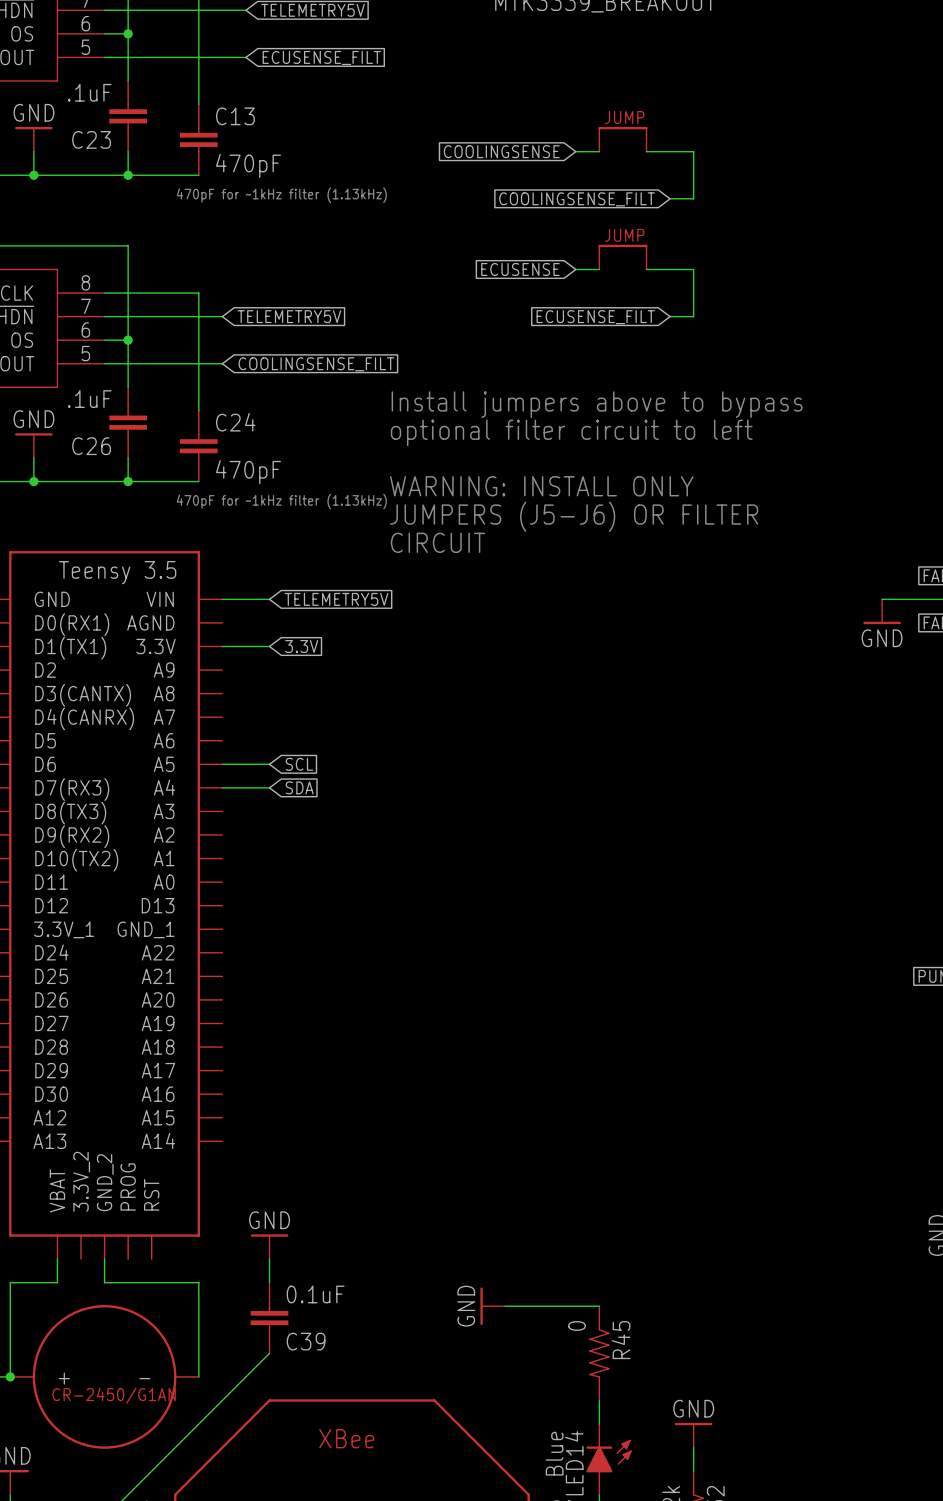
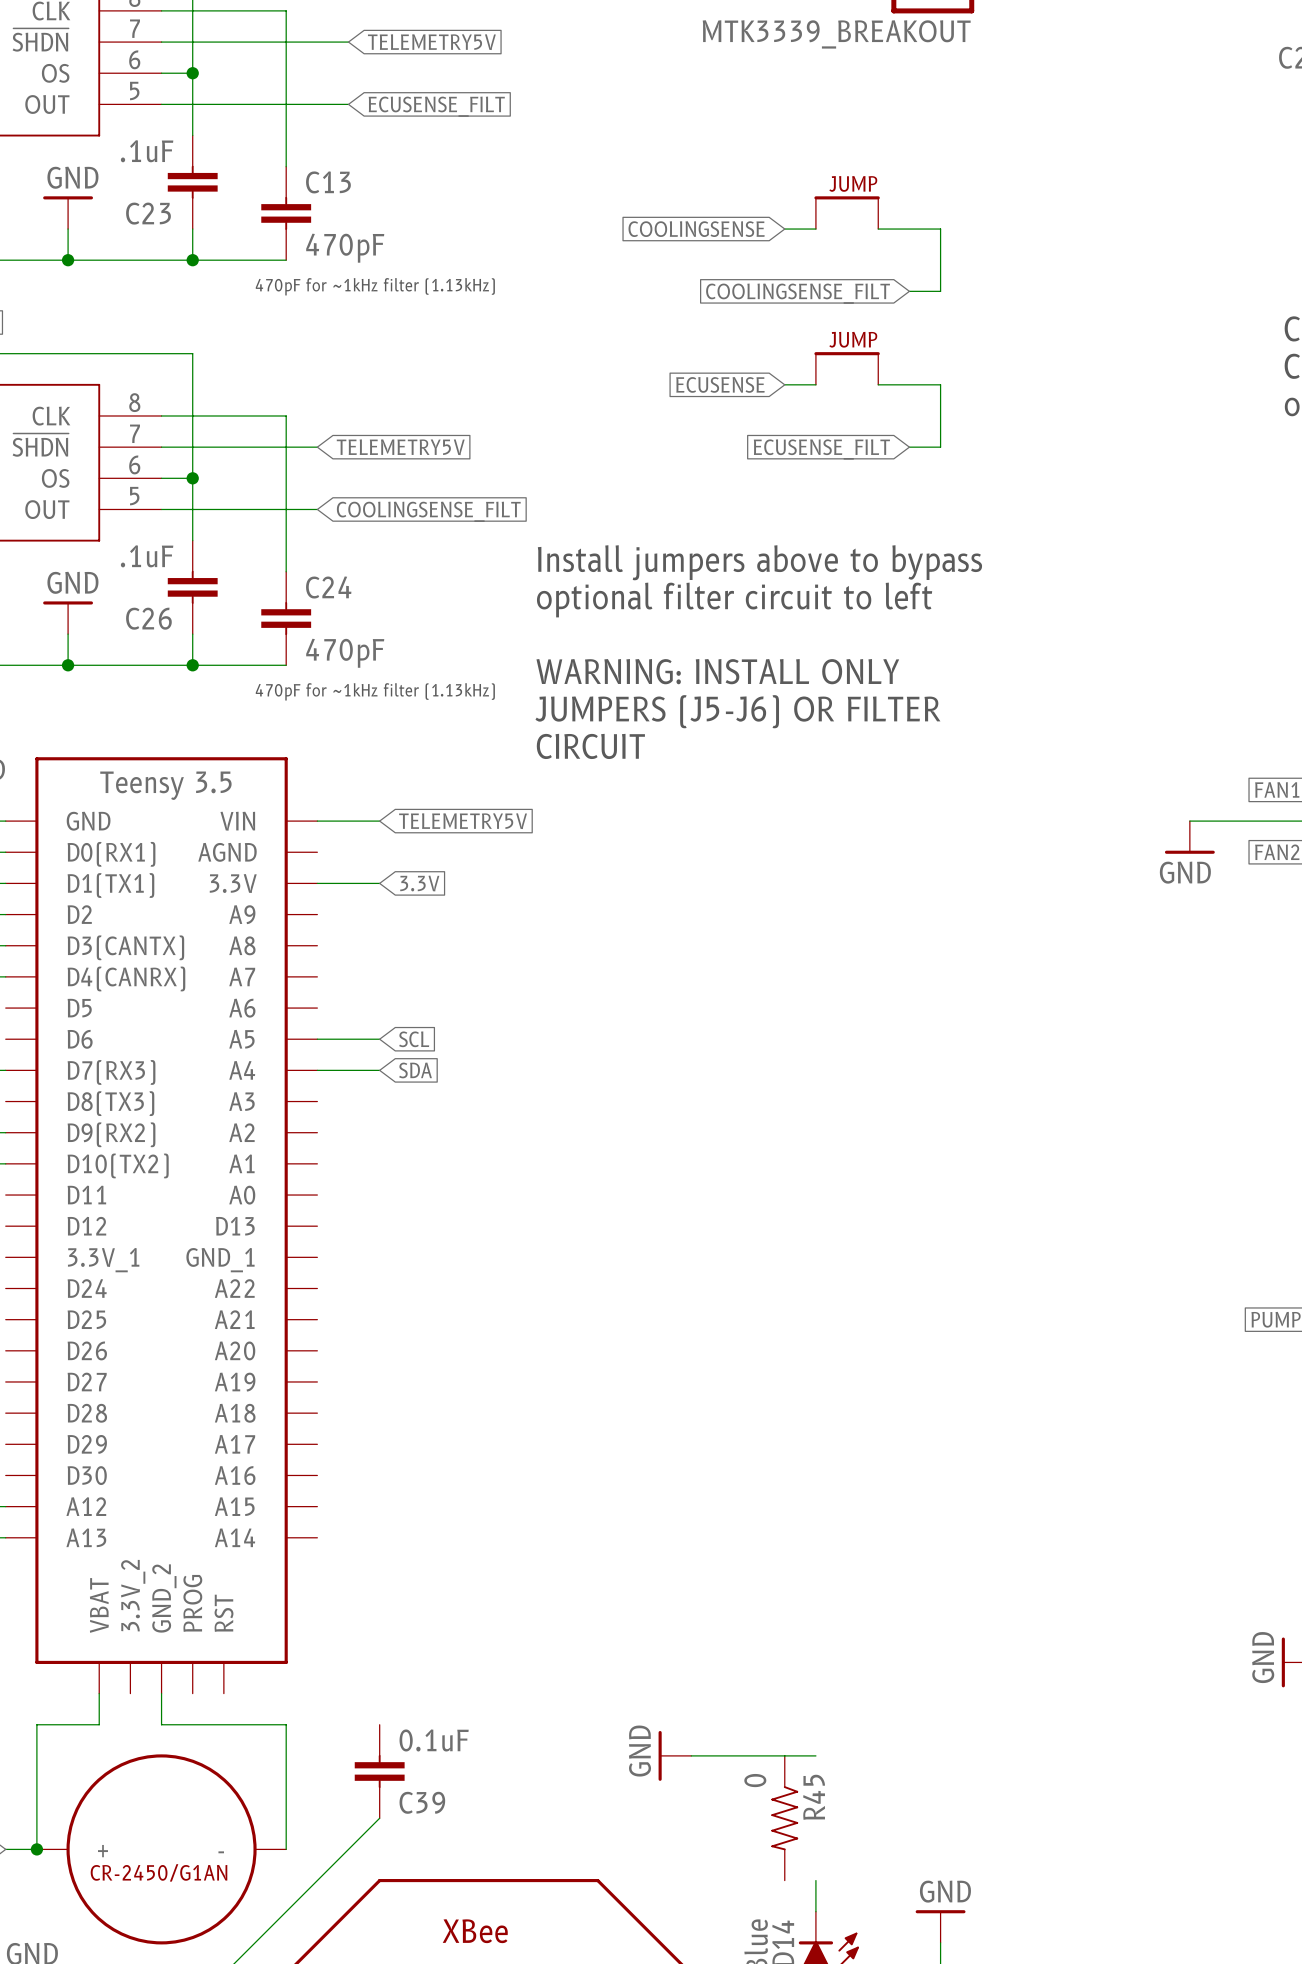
power symbol: GND (269, 1246) -> none
wire: (269, 1259) (269, 1282) -> none
R45 position: (599, 1353) -> (784, 1818)

